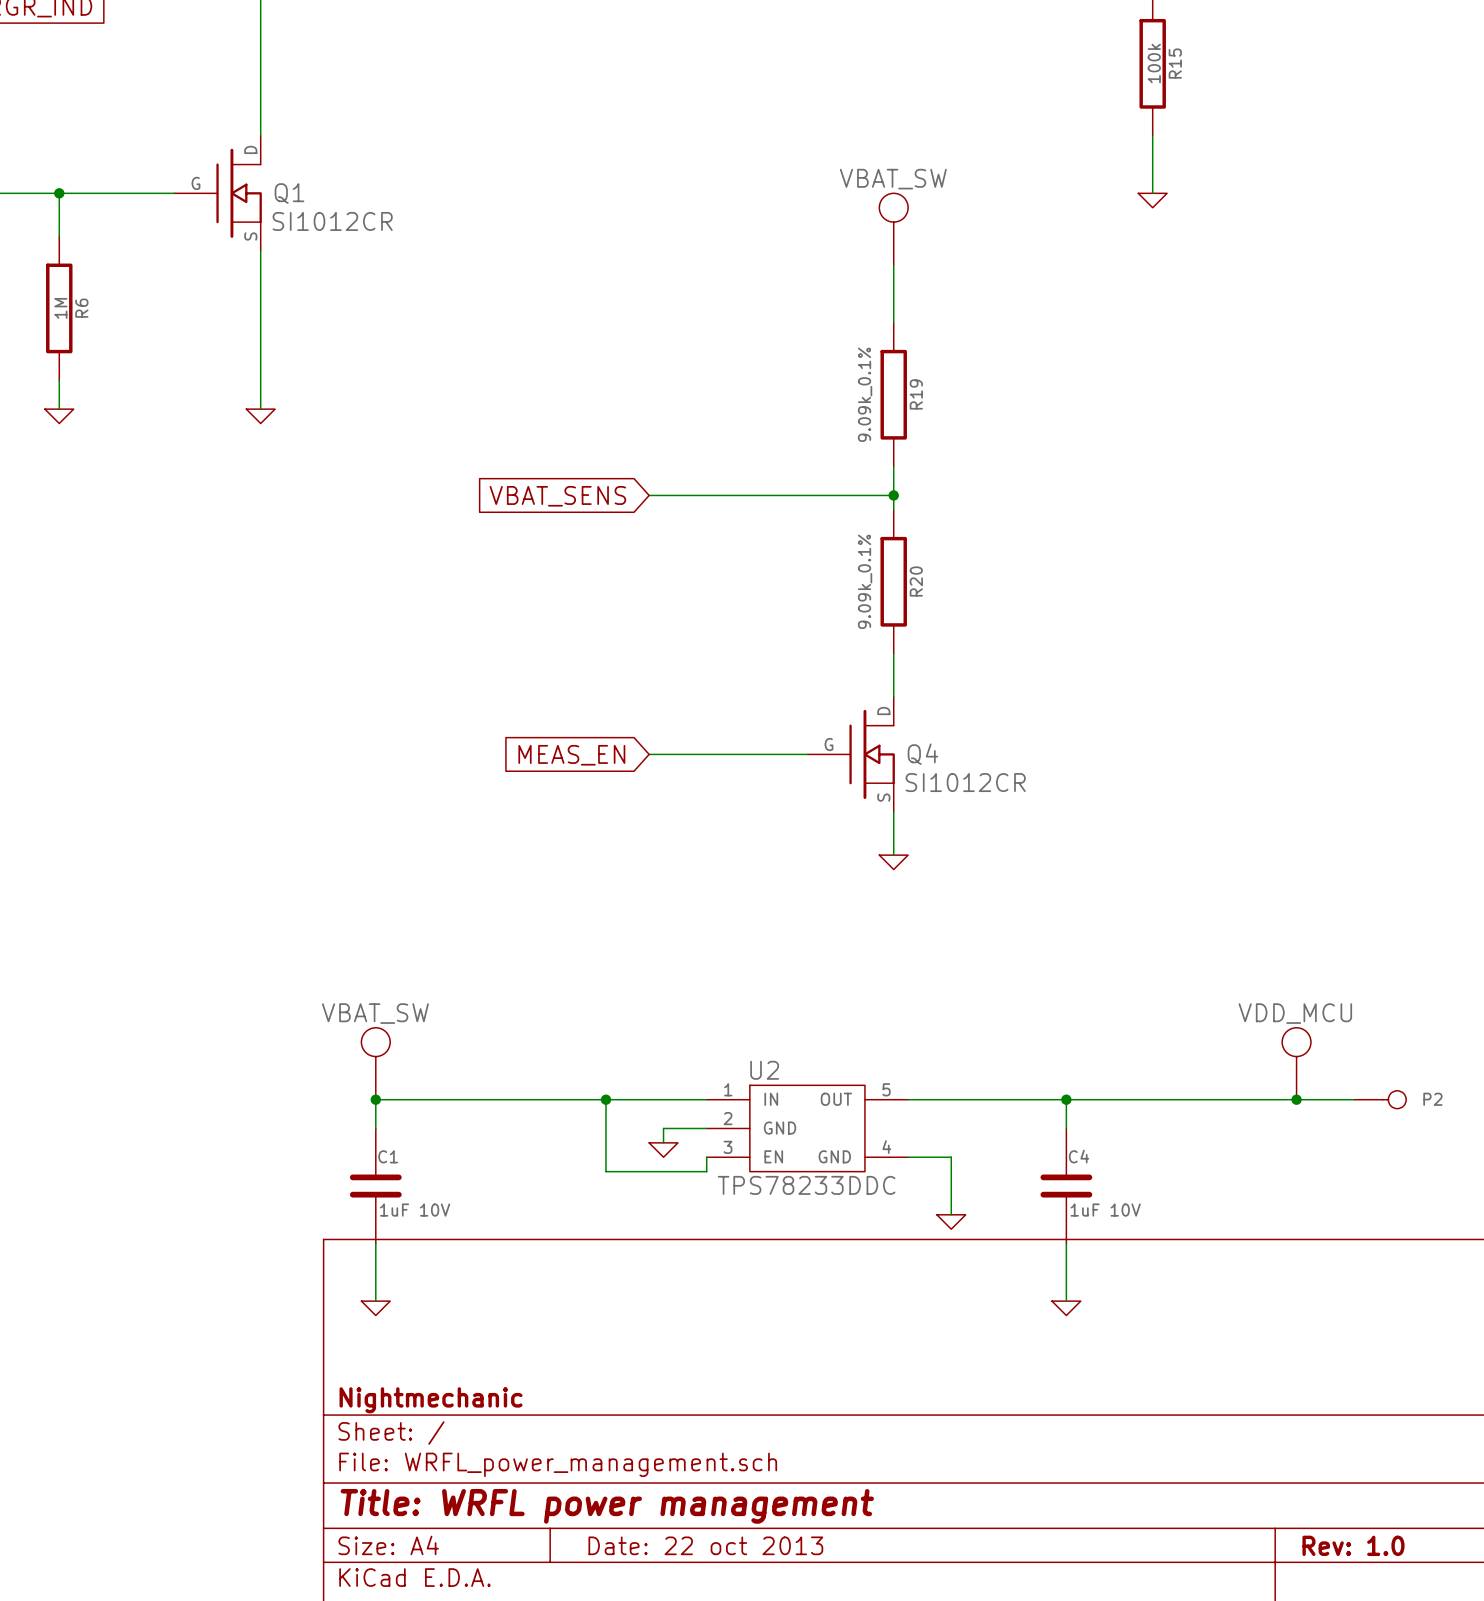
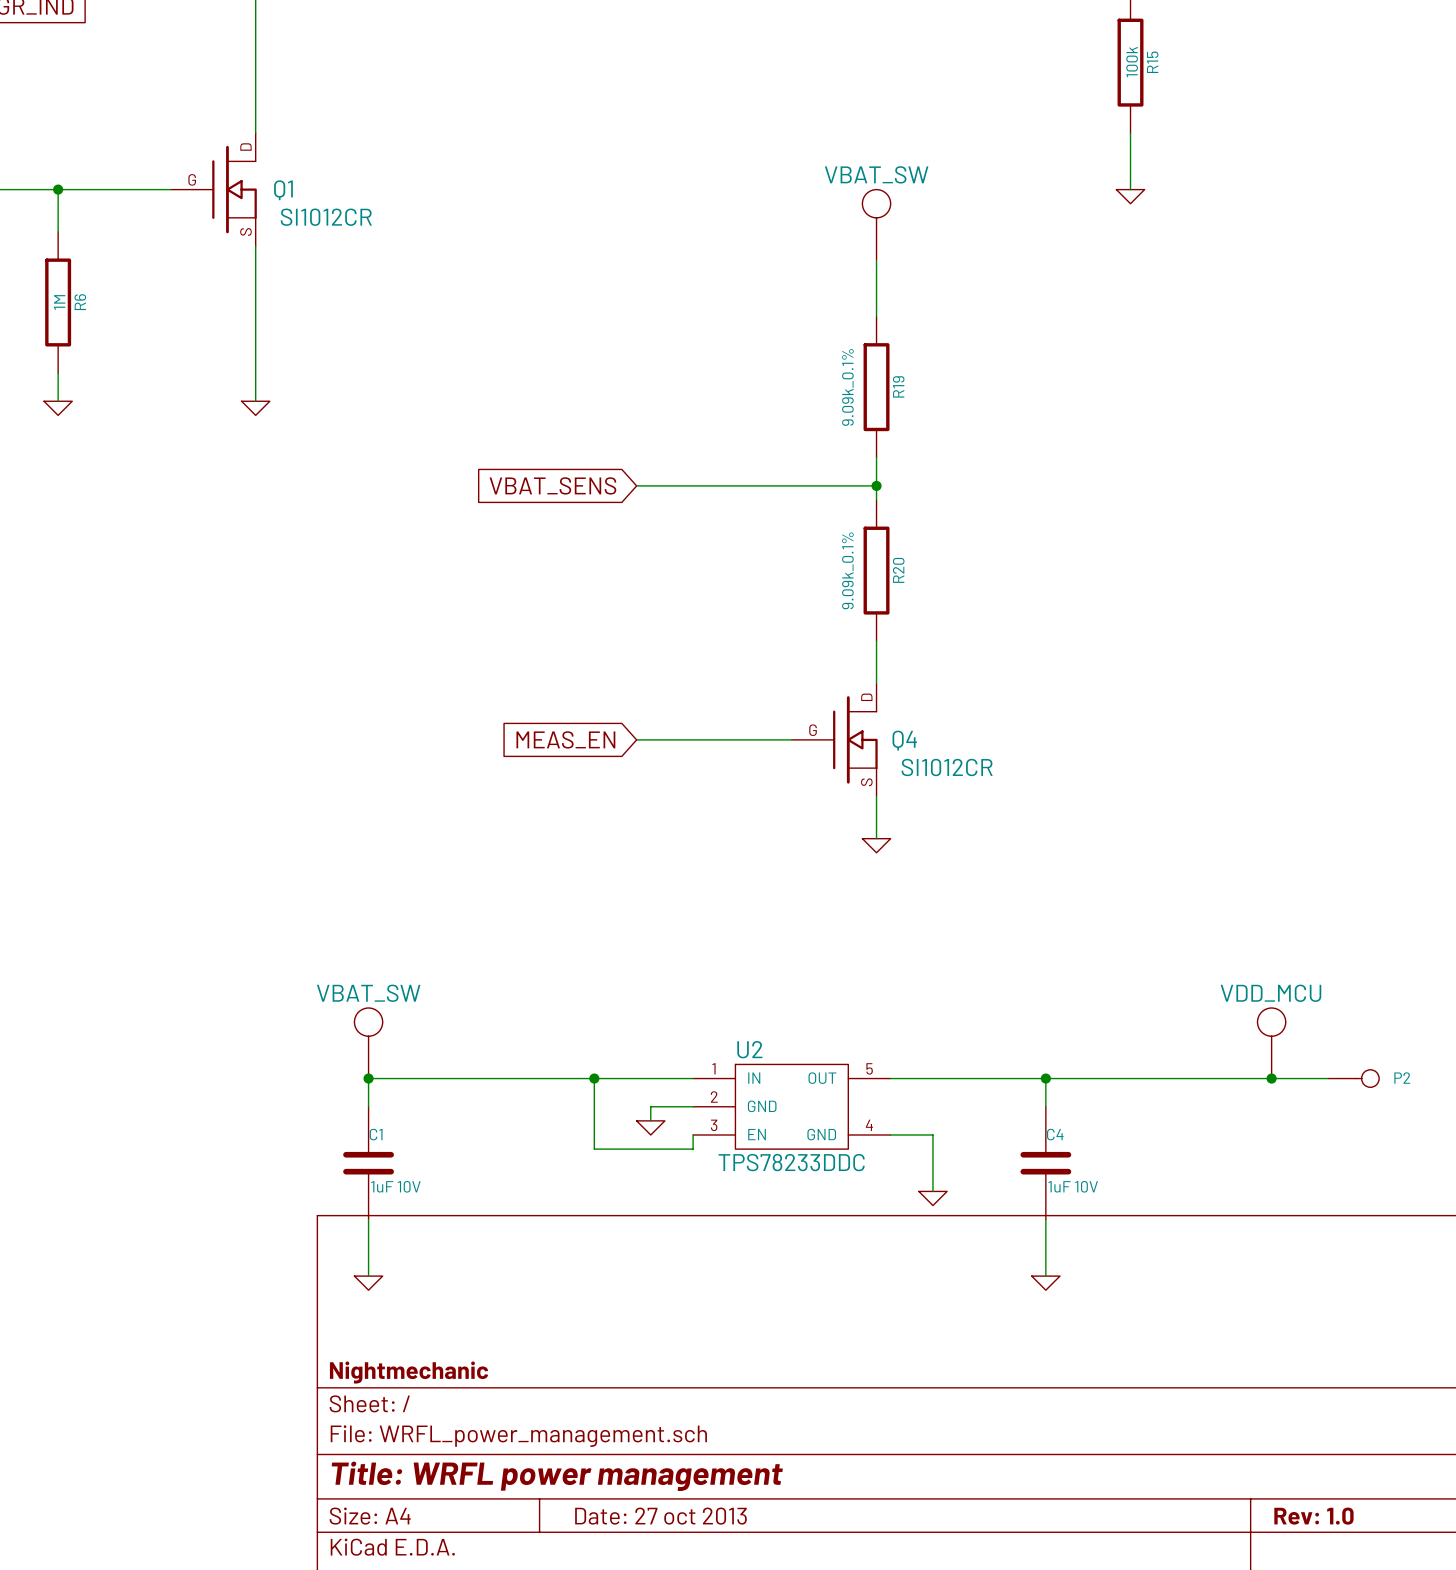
title block: Date: 22 oct 2013 (705, 1545) -> Date: 27 oct 2013 (660, 1516)

